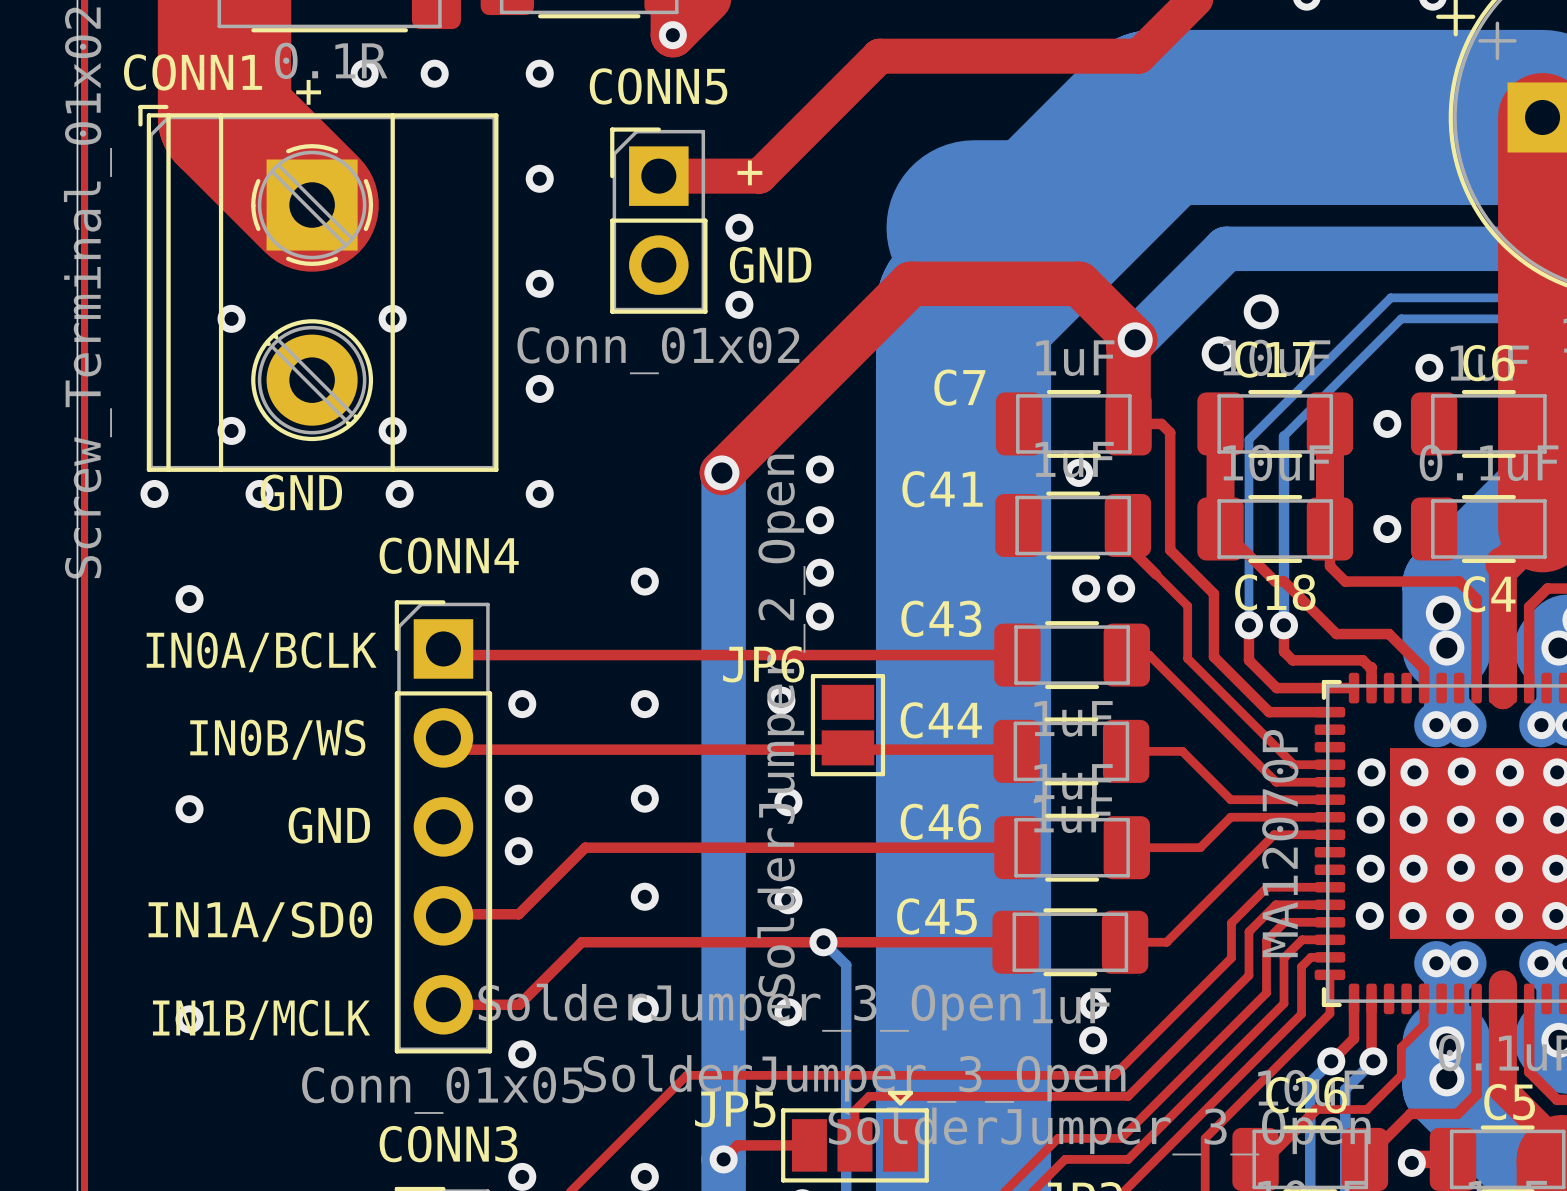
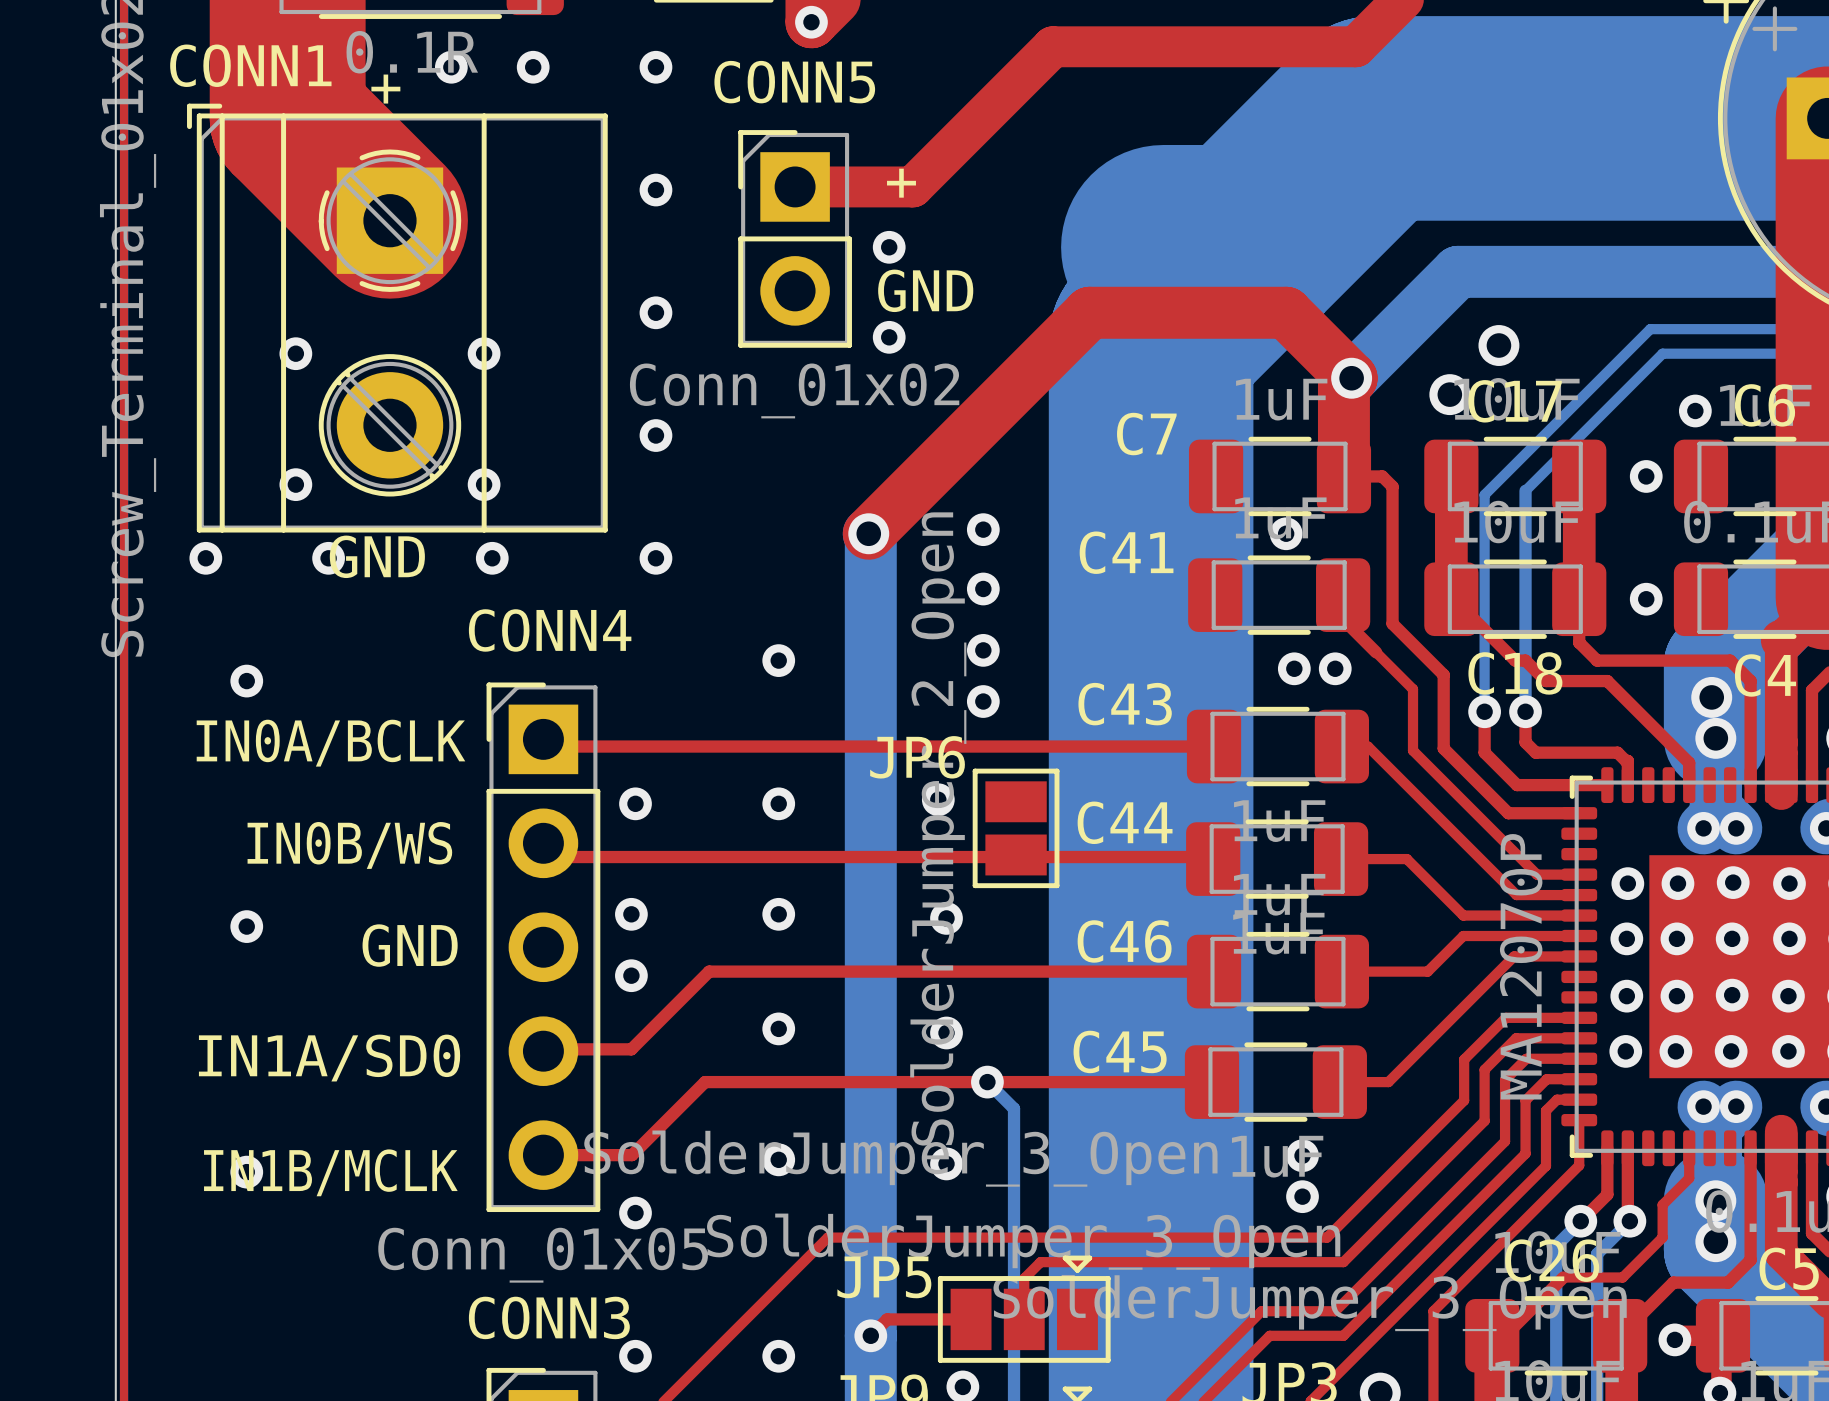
top track: (1301, 599) (1336, 634) (1389, 634) -> (1546, 681) (1607, 681) (1648, 721)

